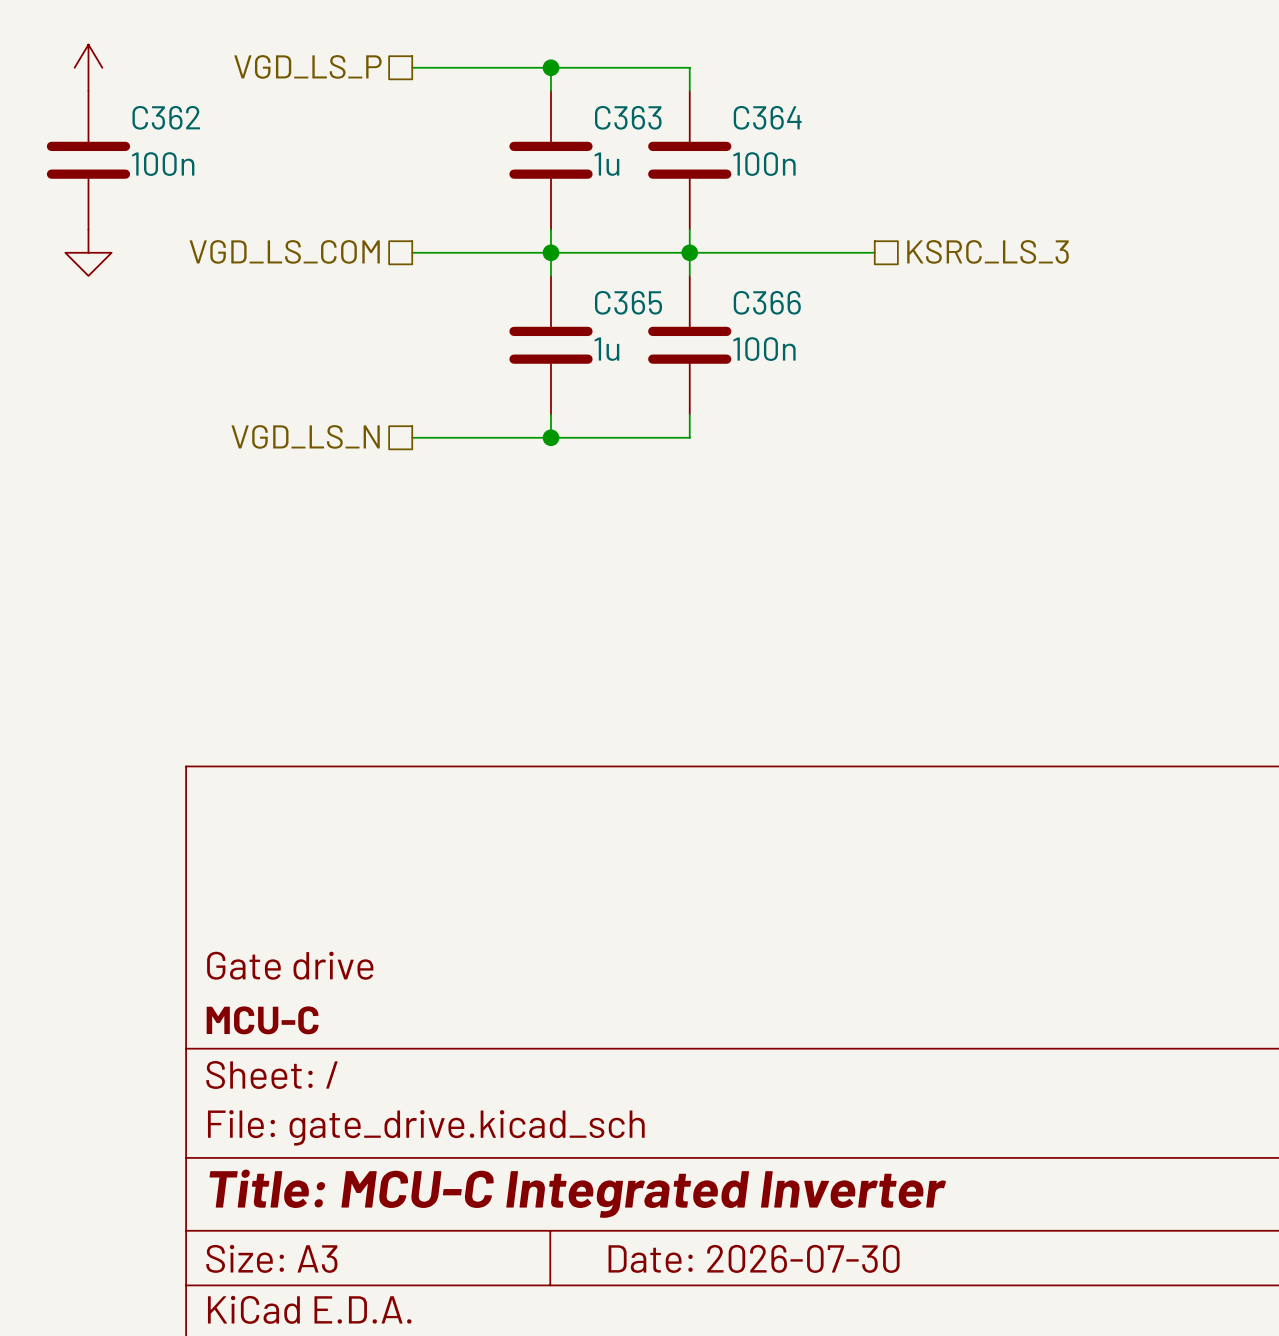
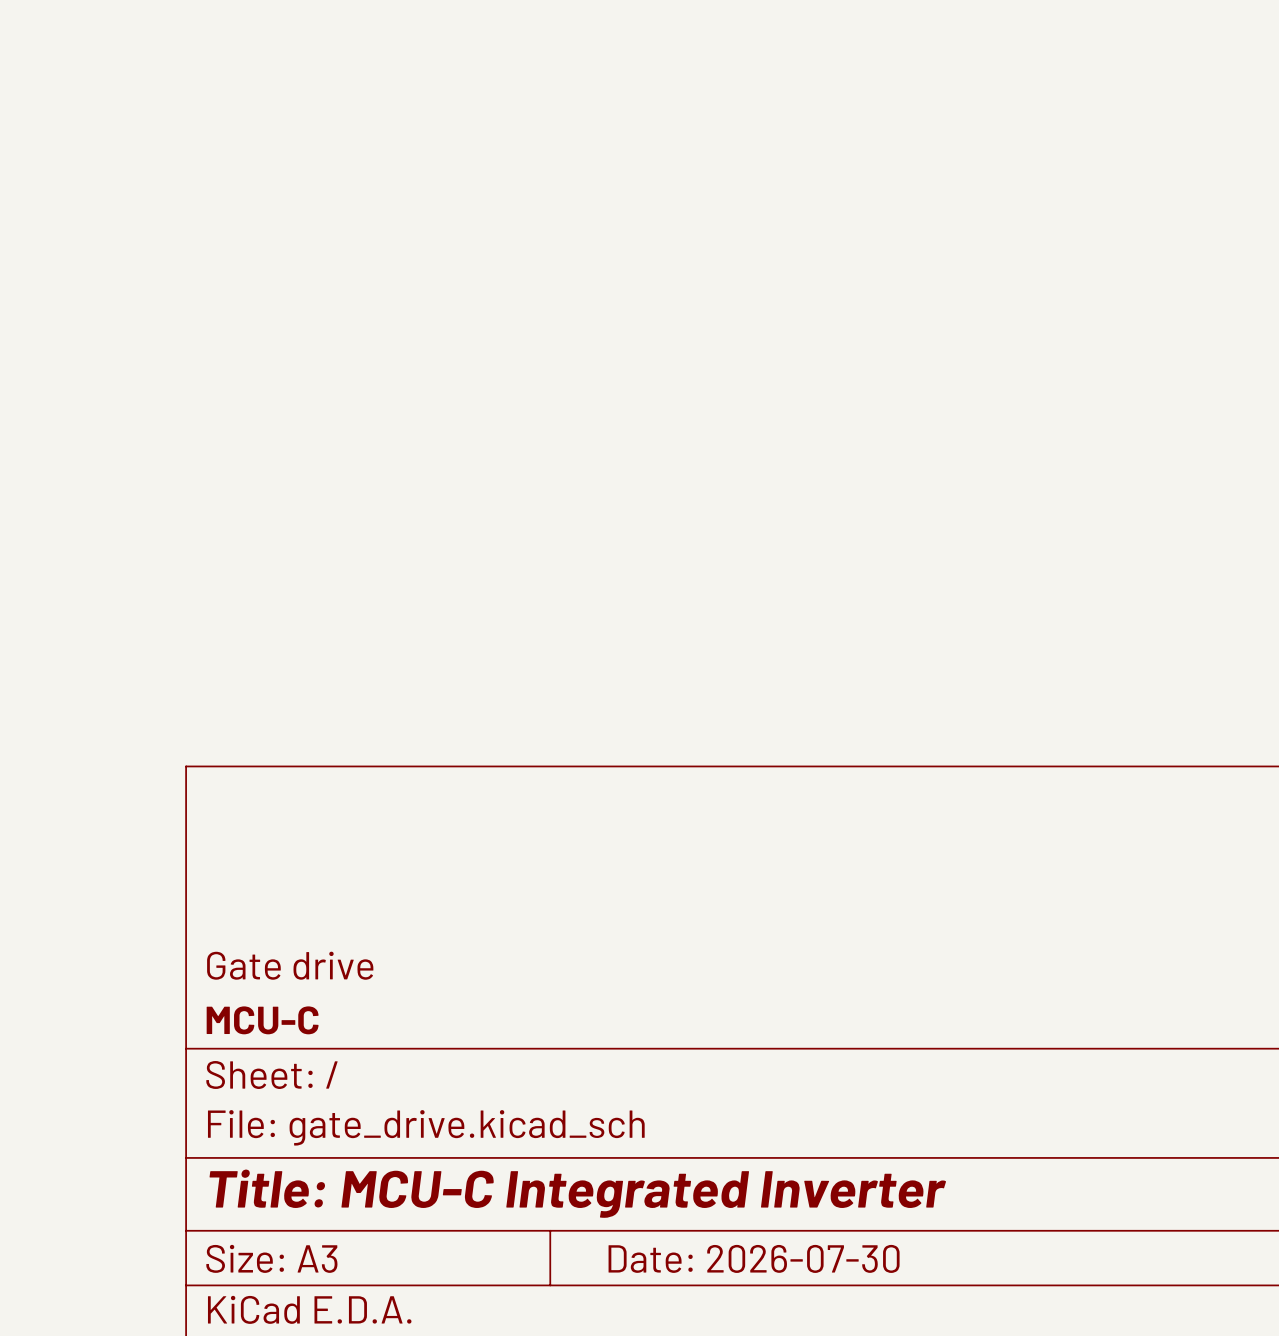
hierarchical label: VGD_LS_P (307, 66) -> none
power symbol: (88, 67) -> none
wire: (412, 67) (689, 67) (689, 90) -> none
wire: (550, 67) (550, 90) -> none
junction: (550, 67) -> none
C362: 100n (88, 160) -> none
C363: 1u (550, 160) -> none
C364: 100n (689, 160) -> none
wire: (550, 229) (550, 275) -> none
wire: (689, 229) (689, 275) -> none
hierarchical label: VGD_LS_COM (284, 251) -> none
hierarchical label: KSRC_LS_3 (988, 251) -> none
power symbol: (88, 252) -> none
wire: (412, 252) (874, 252) -> none
junction: (550, 252) -> none
junction: (689, 252) -> none
C365: 1u (550, 345) -> none
C366: 100n (689, 345) -> none
wire: (550, 414) (550, 437) -> none
wire: (689, 414) (689, 437) (412, 437) -> none
hierarchical label: VGD_LS_N (305, 436) -> none
junction: (550, 437) -> none

